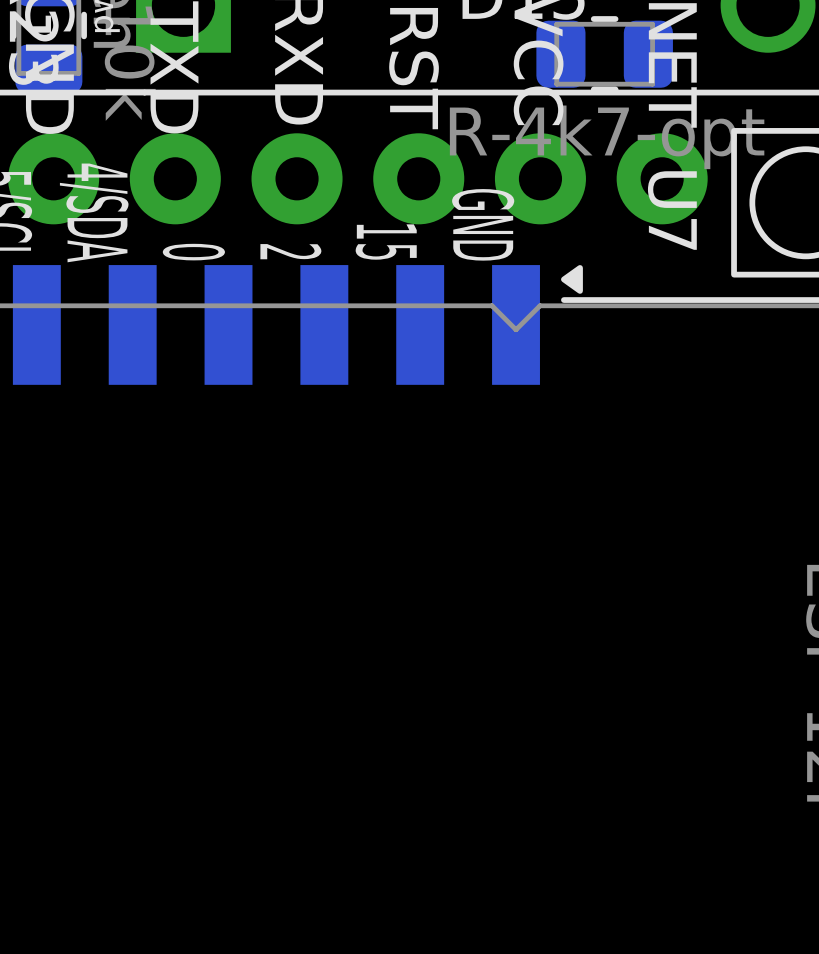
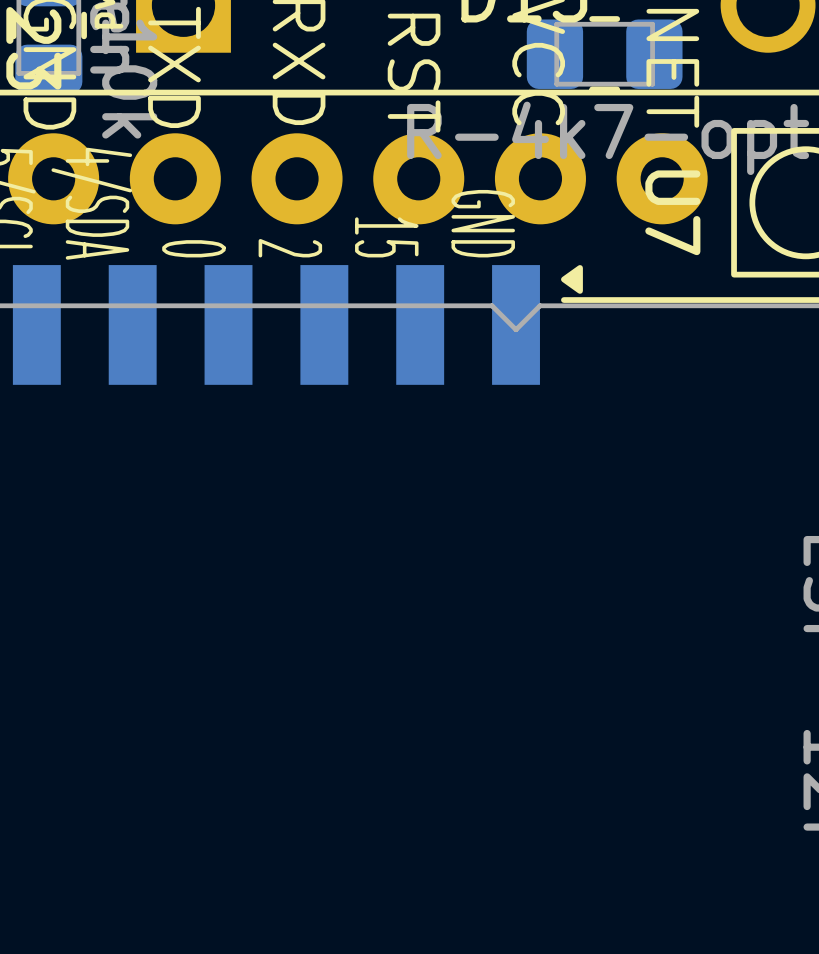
part footprint: [536, 16, 673, 93] -> [526, 16, 683, 93]

